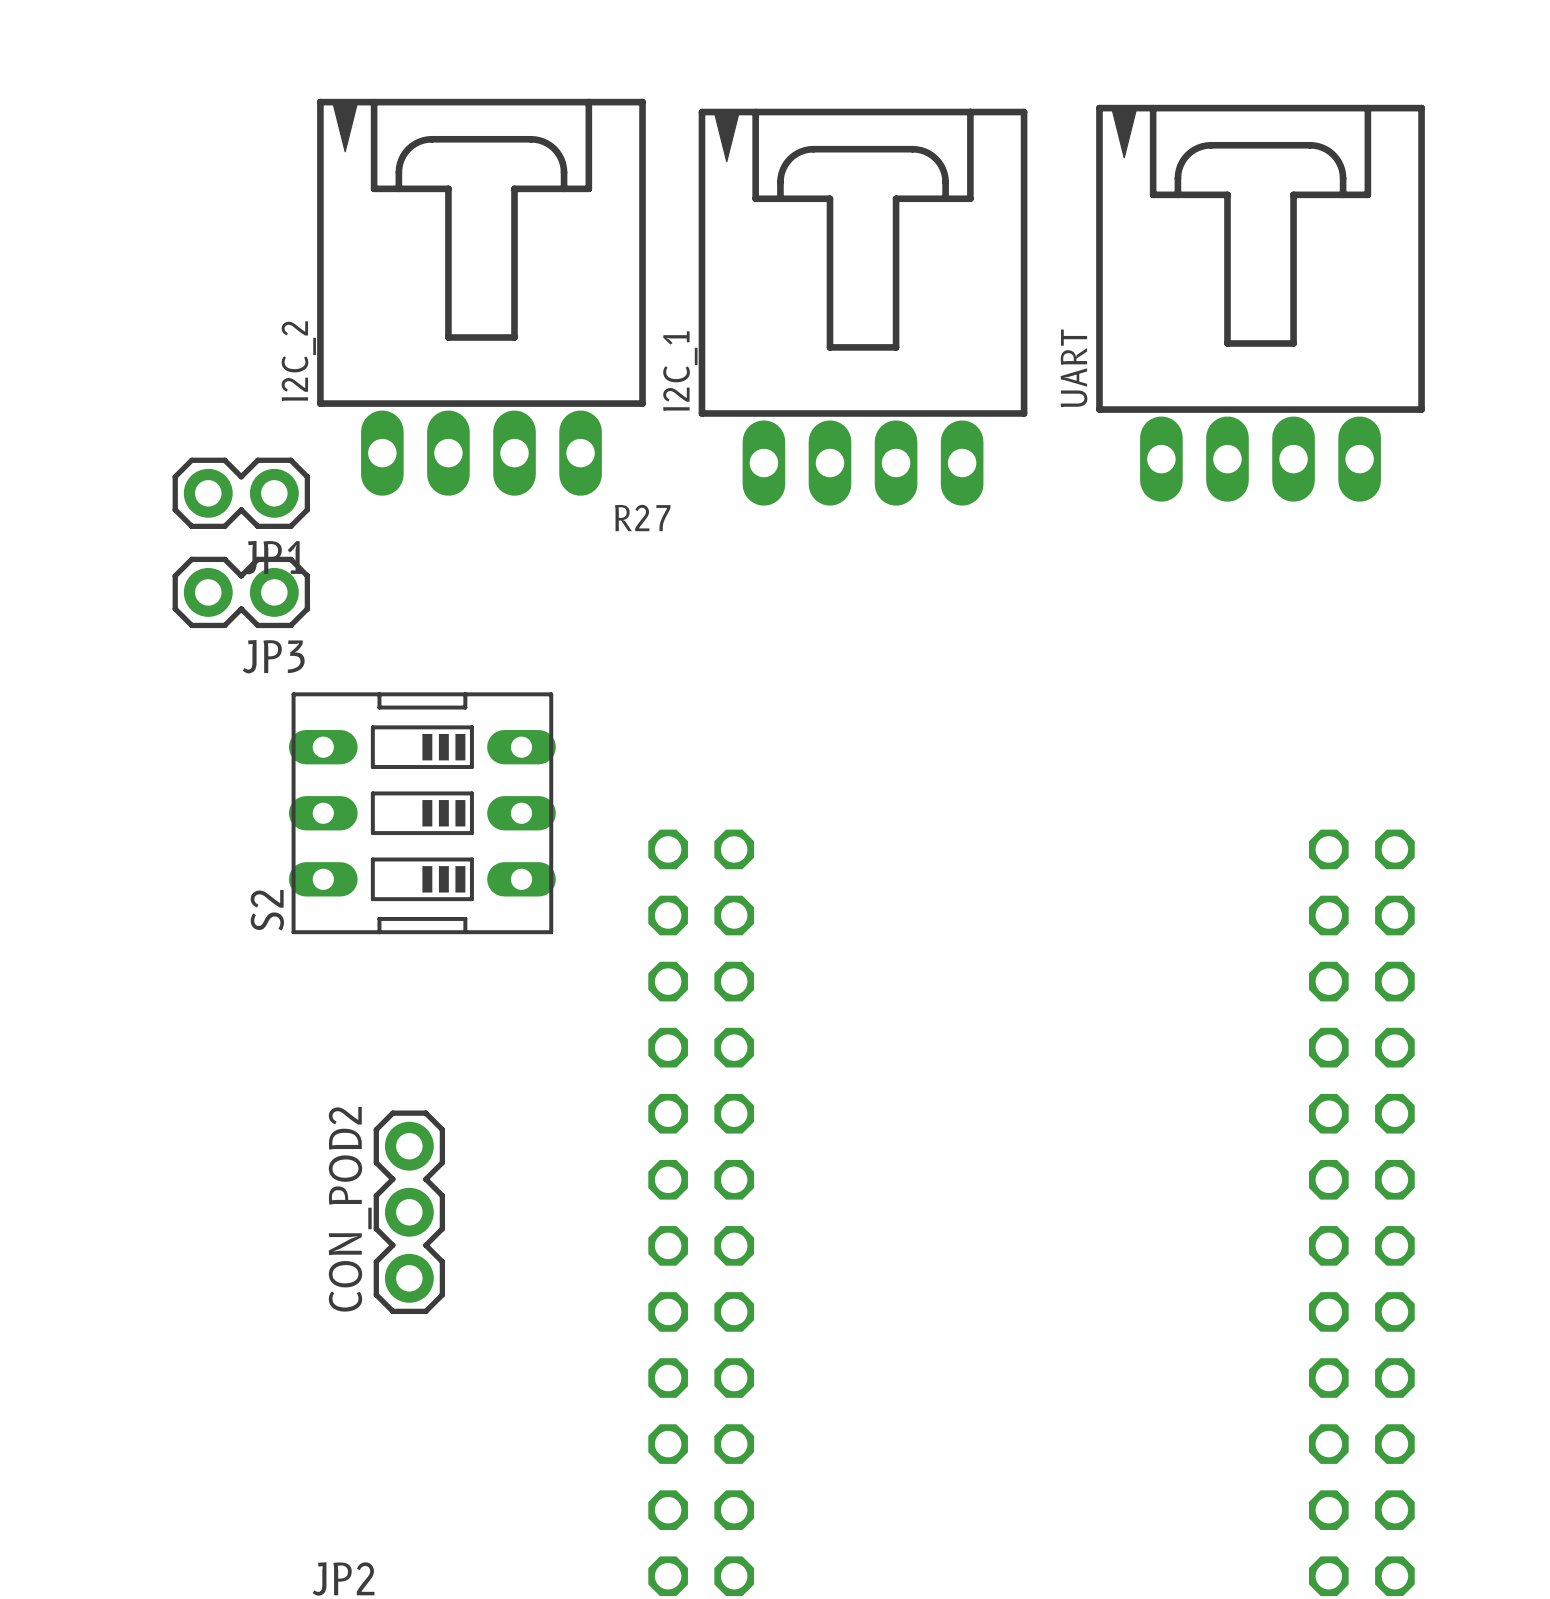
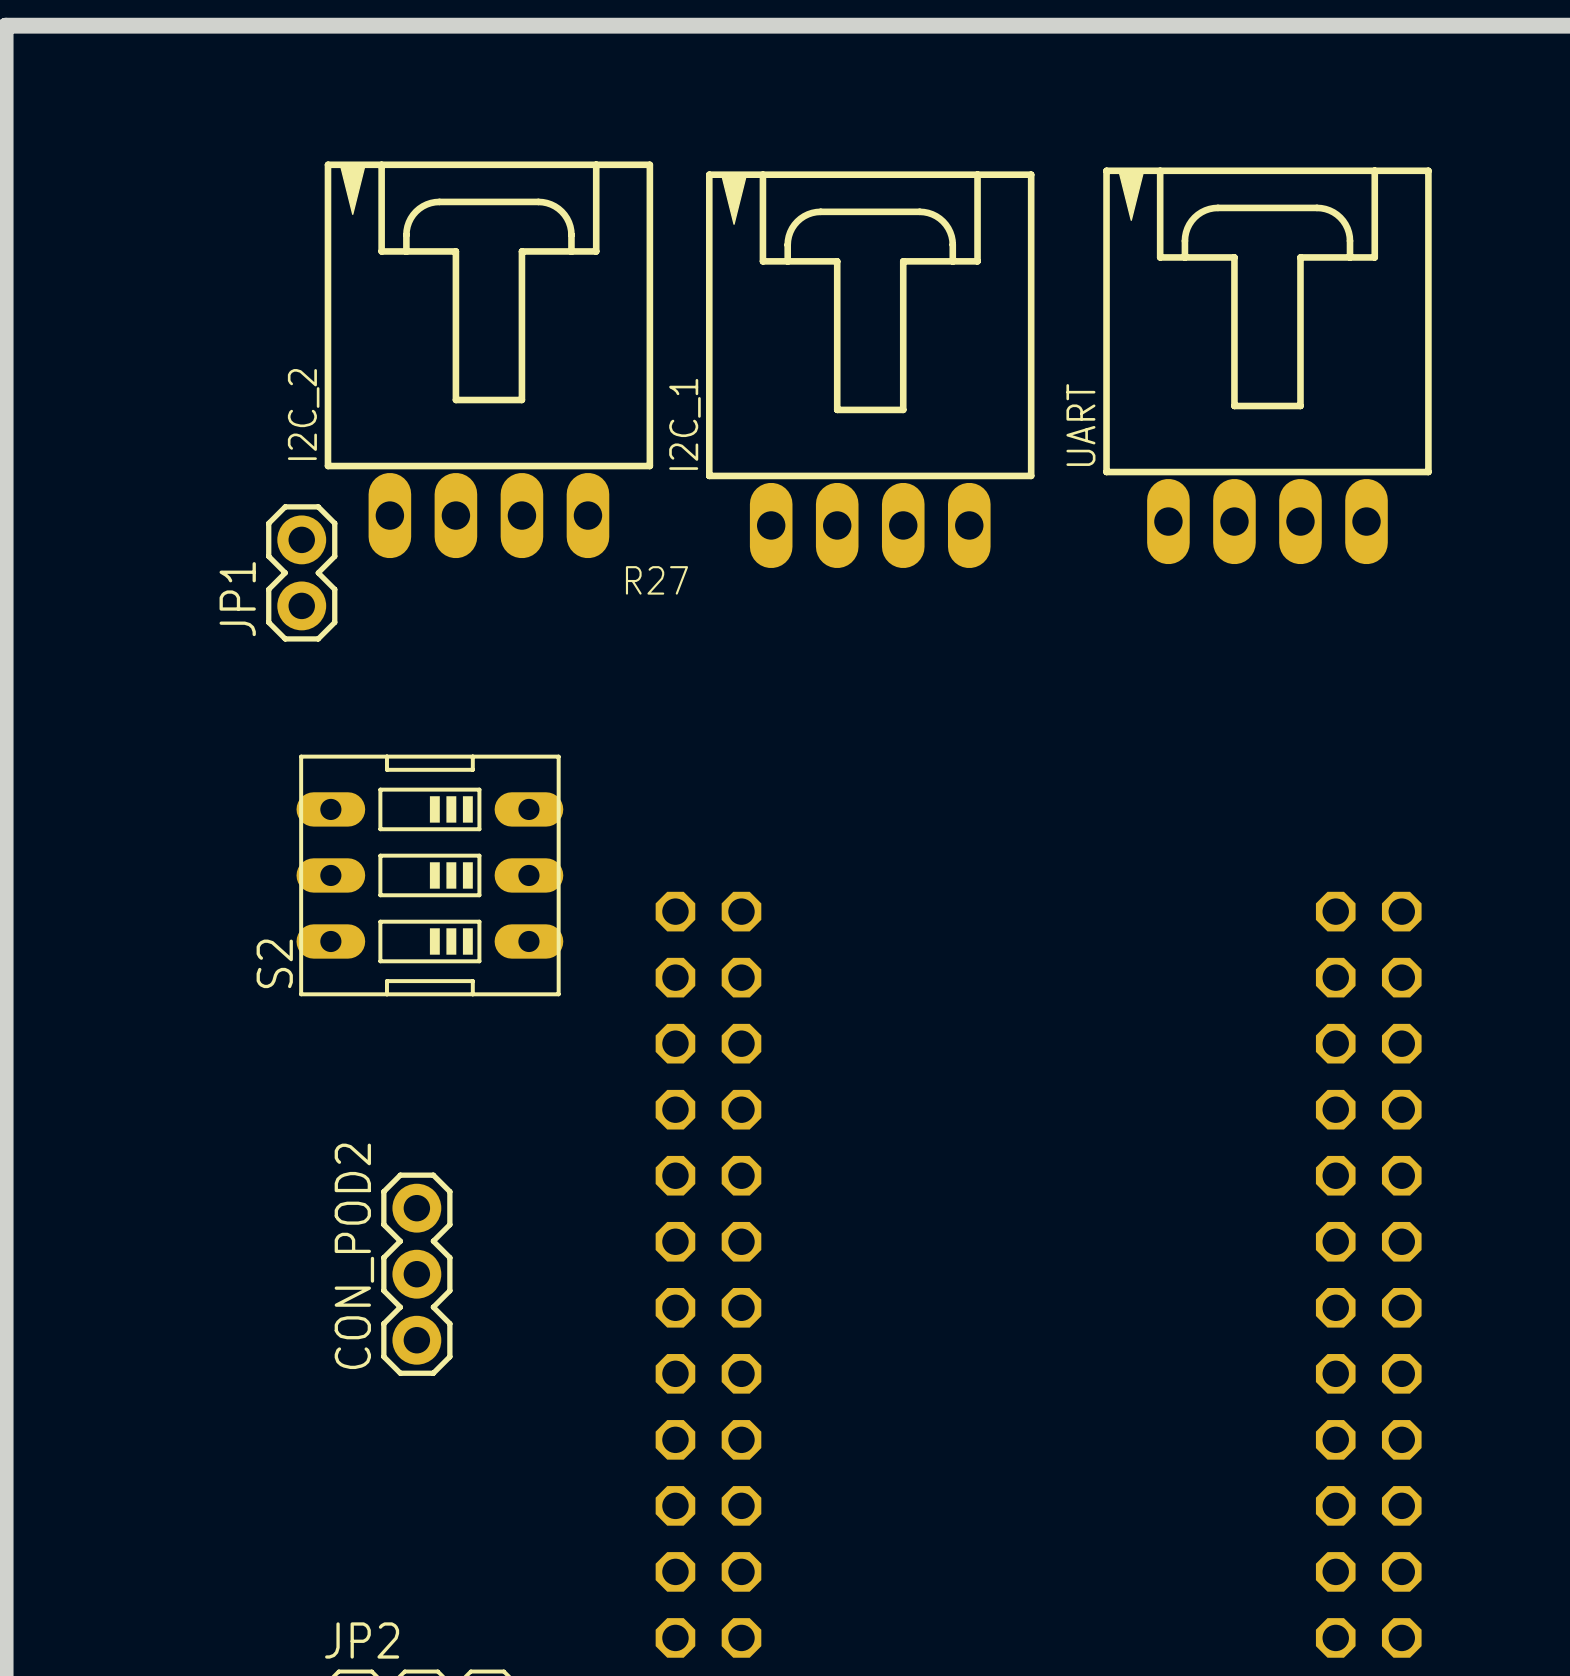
JP1 rotation: 0° (241, 493) -> 90° clockwise (301, 572)
JP3: (241, 592) -> none

